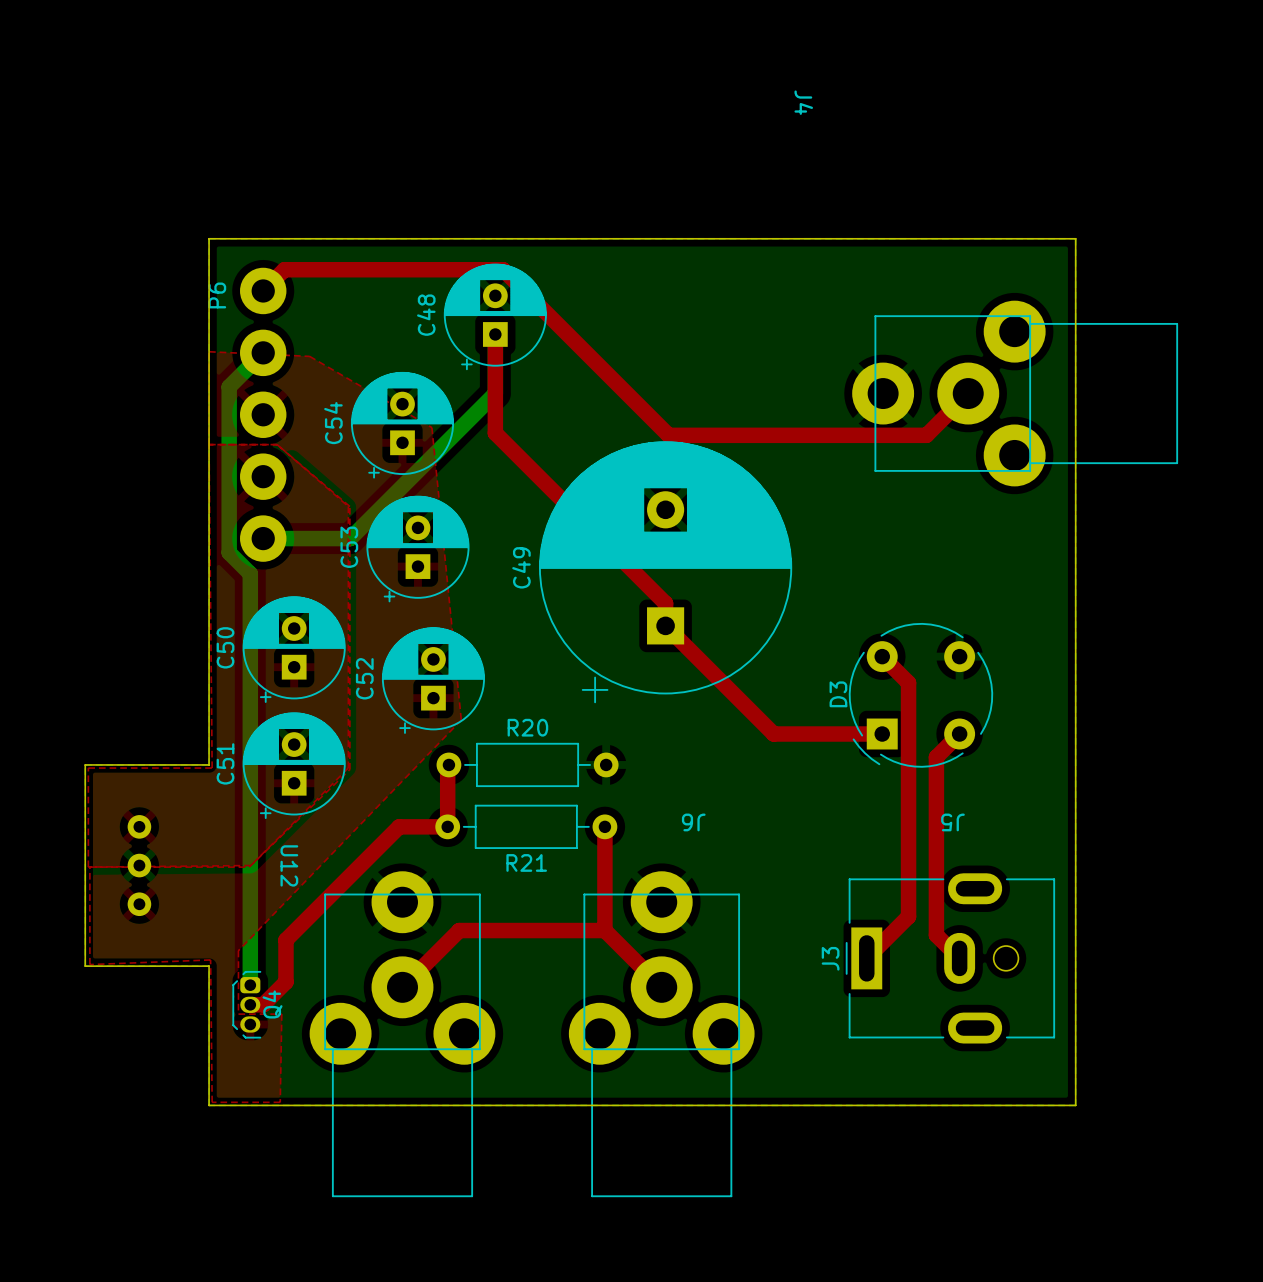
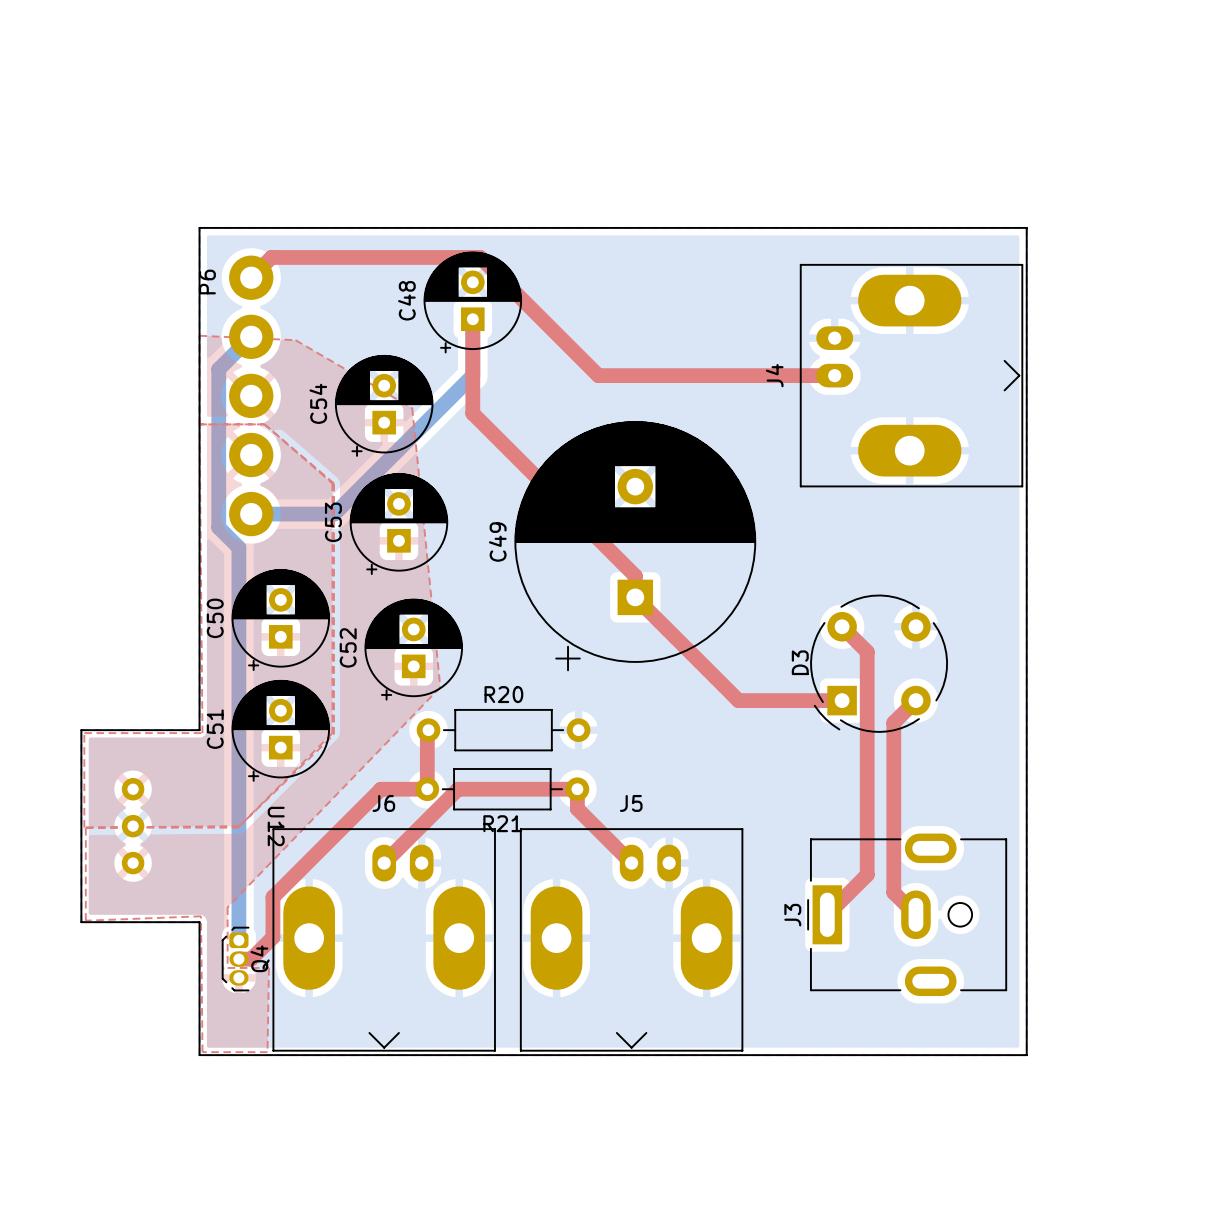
J4 name position: J4 (803, 102) -> J4 (774, 375)
J4 footprint: [852, 300, 1179, 487] -> [799, 263, 1024, 488]
top track: (626, 393) (668, 435) (926, 435) (968, 393) -> (598, 375) (834, 375)
J6 name position: J6 (693, 822) -> J6 (383, 803)
J5 name position: J5 (952, 822) -> J5 (631, 803)
top track: none -> (577, 789) (458, 789) (384, 863)
top track: (604, 847) (604, 930) -> (577, 808) (631, 863)
J6 footprint: [309, 871, 496, 1198] -> [272, 828, 496, 1052]
J5 footprint: [568, 871, 755, 1198] -> [519, 828, 744, 1052]
top track: (604, 930) (661, 987) -> none
top track: (604, 930) (459, 930) (402, 987) -> none

